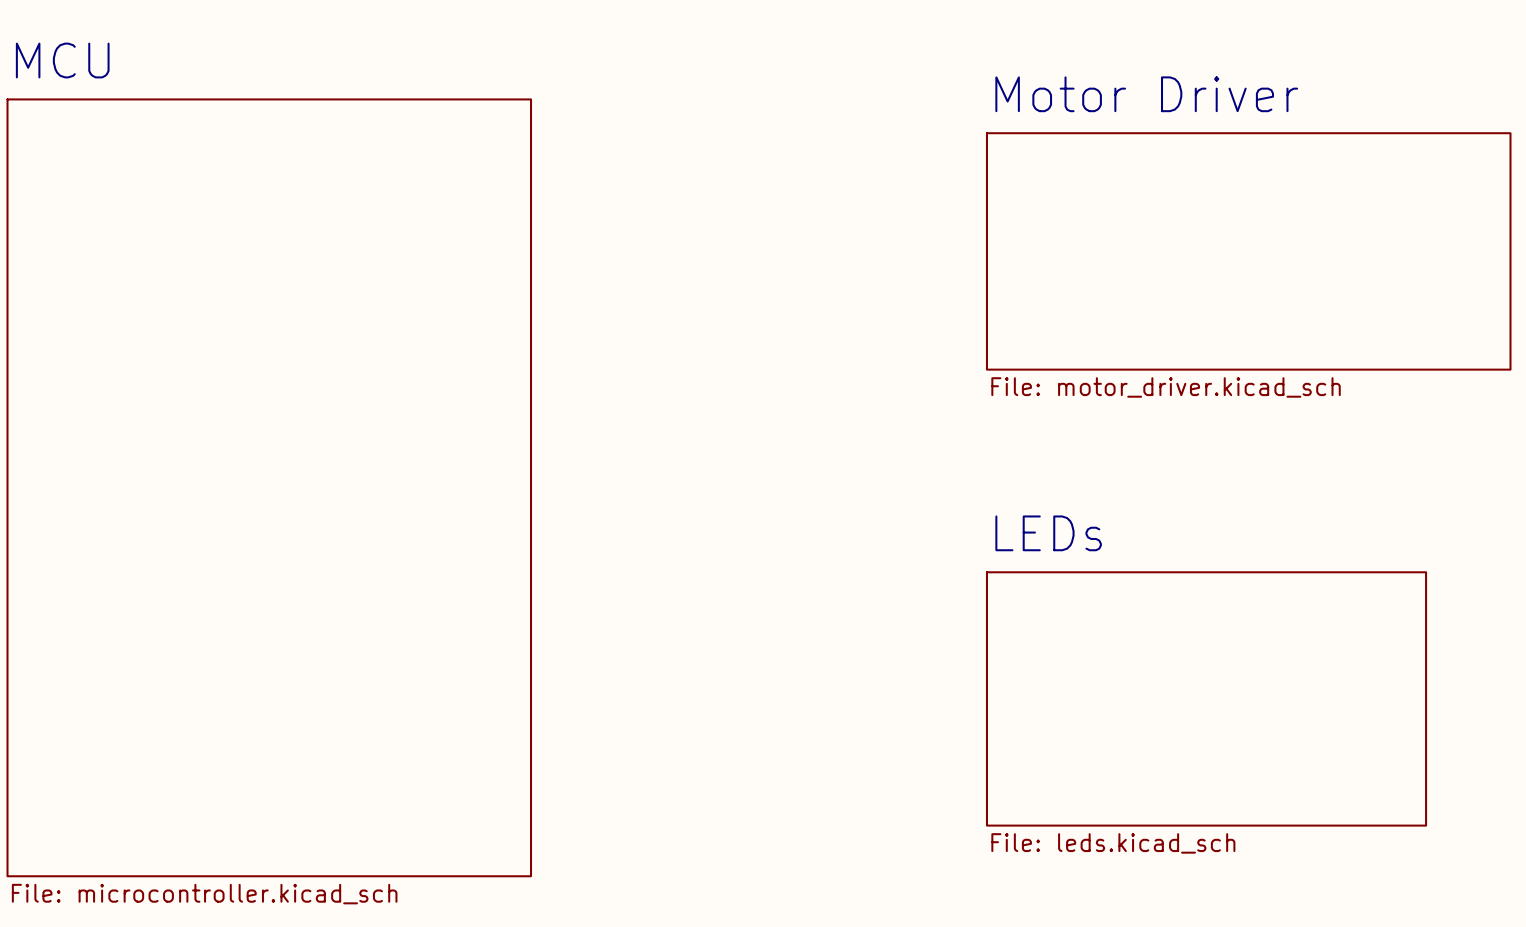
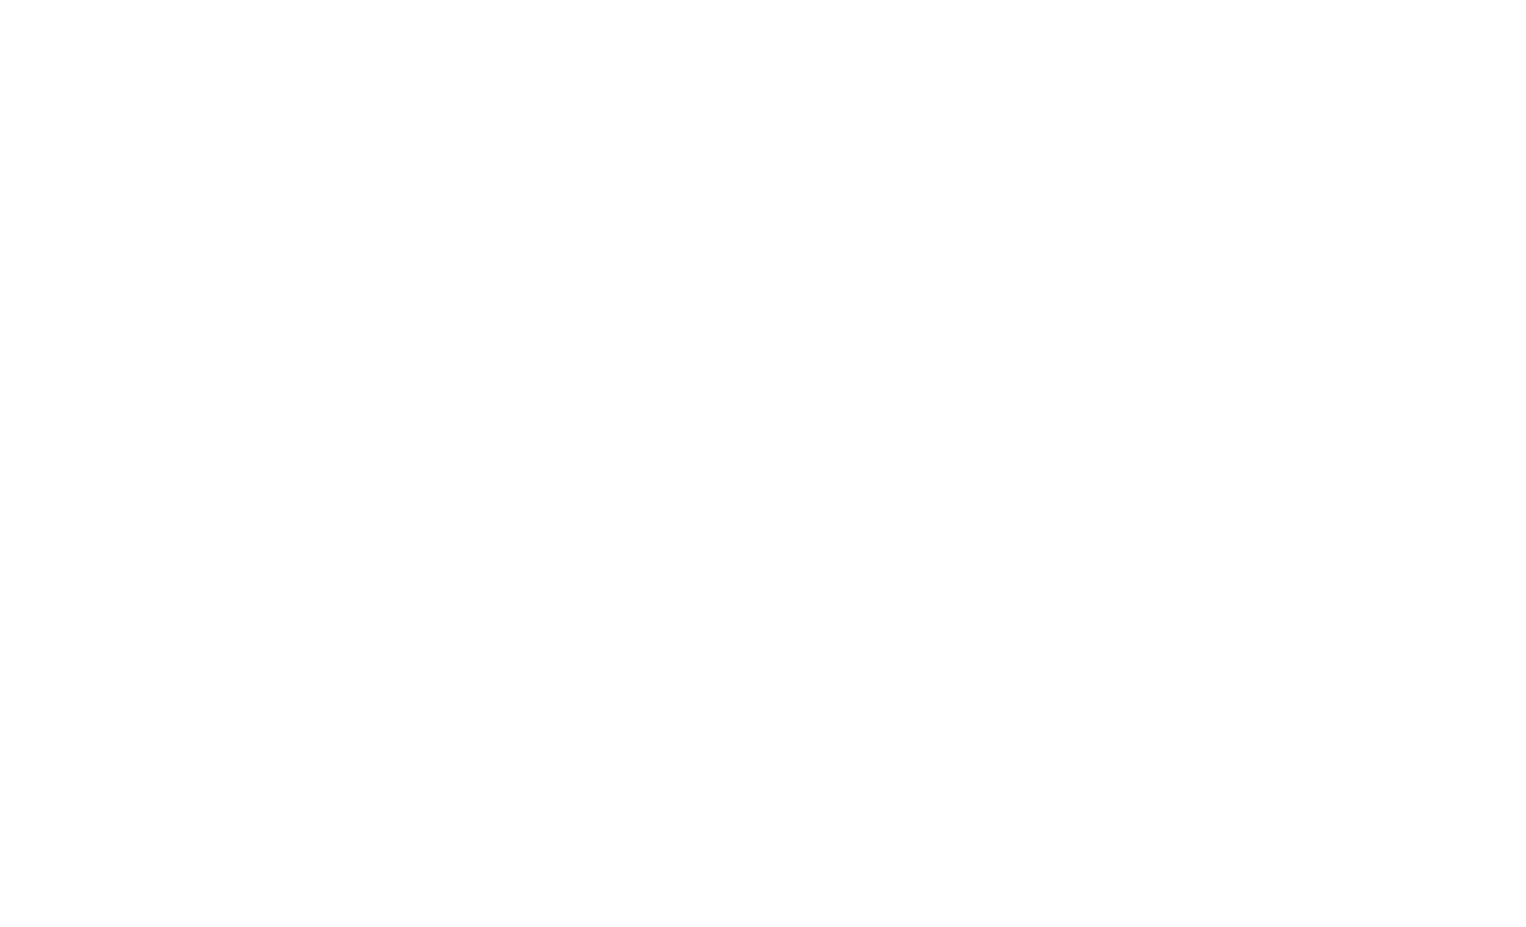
sheet Motor Driver: File: motor_driver.kicad_sch (1248, 251) -> none
sheet MCU: File: microcontroller.kicad_sch (269, 487) -> none
sheet LEDs: File: leds.kicad_sch (1206, 698) -> none

